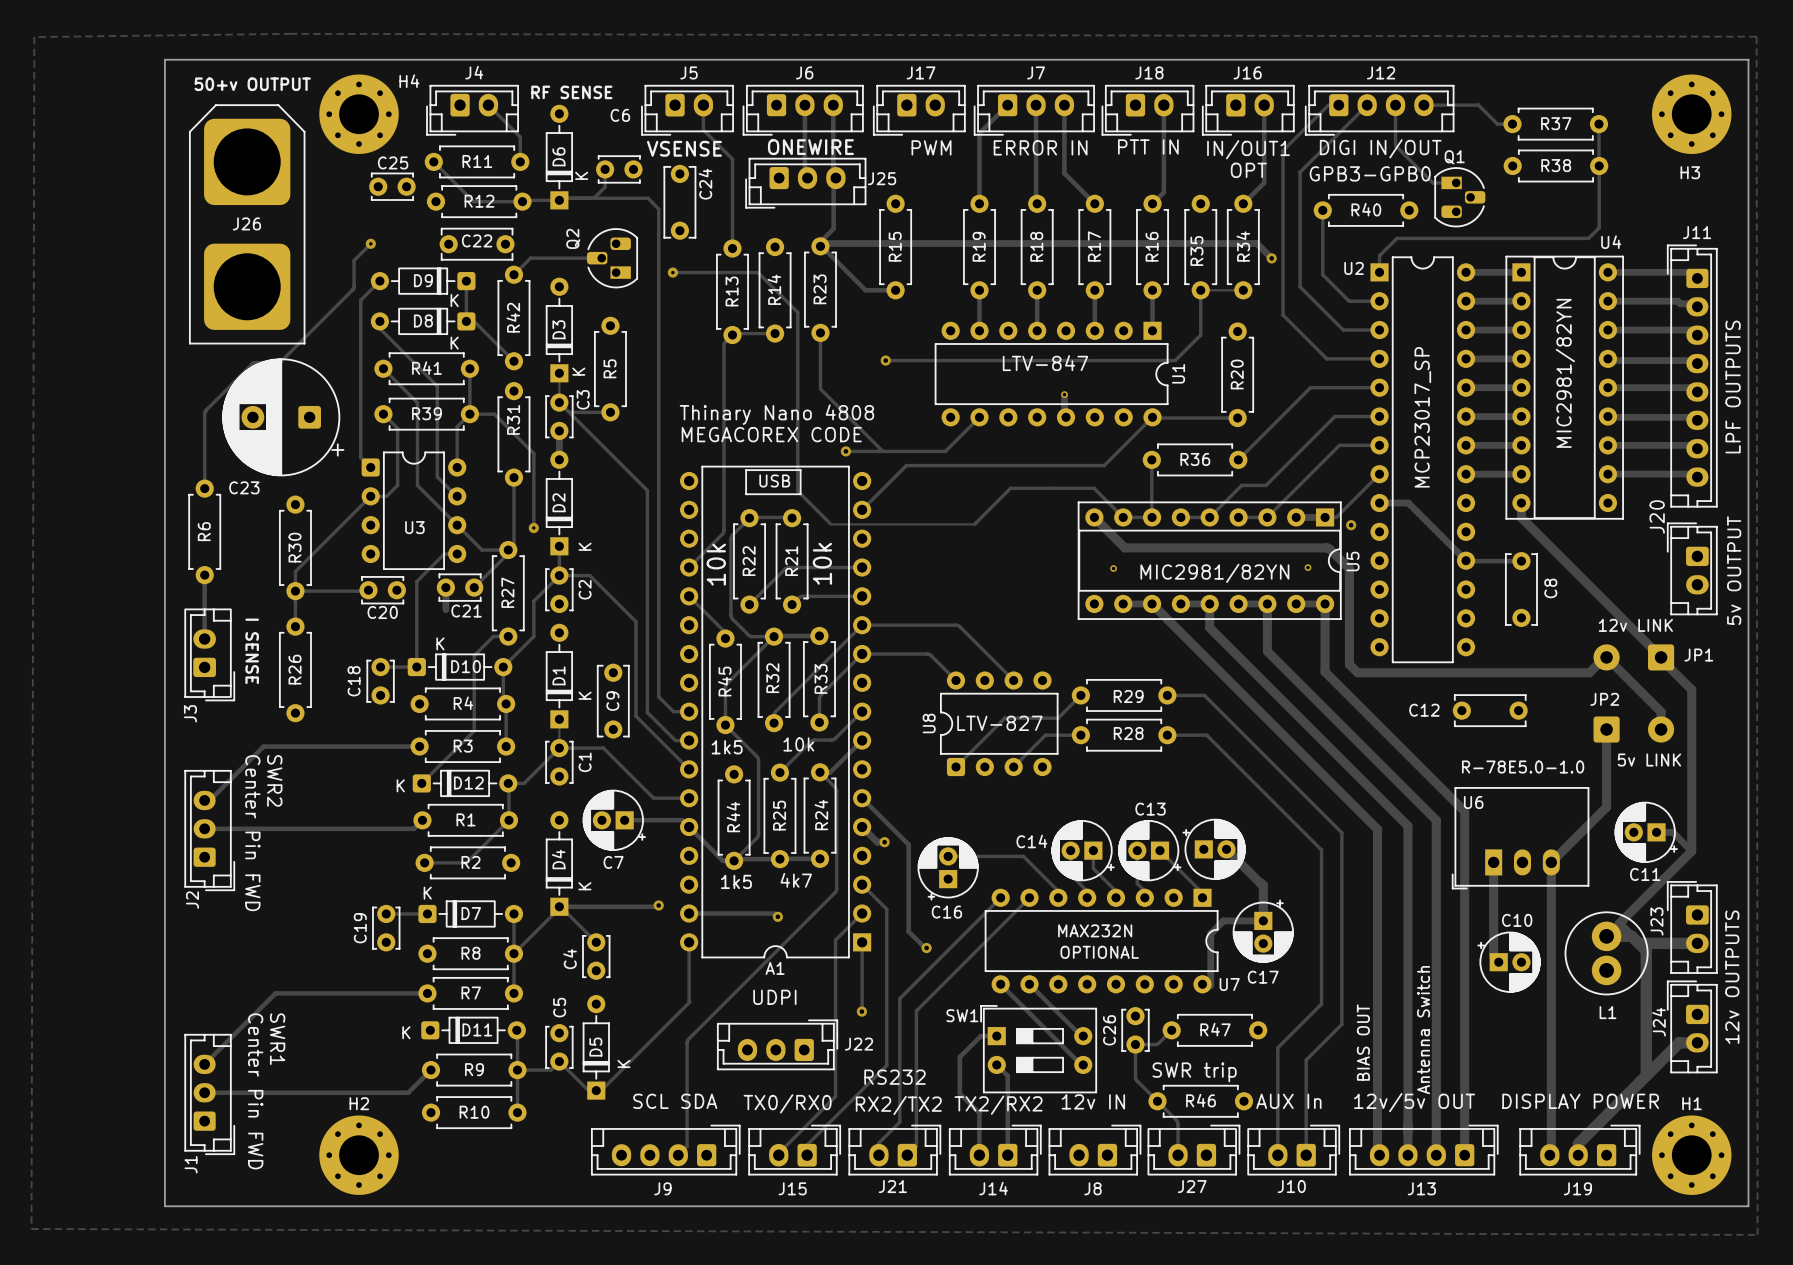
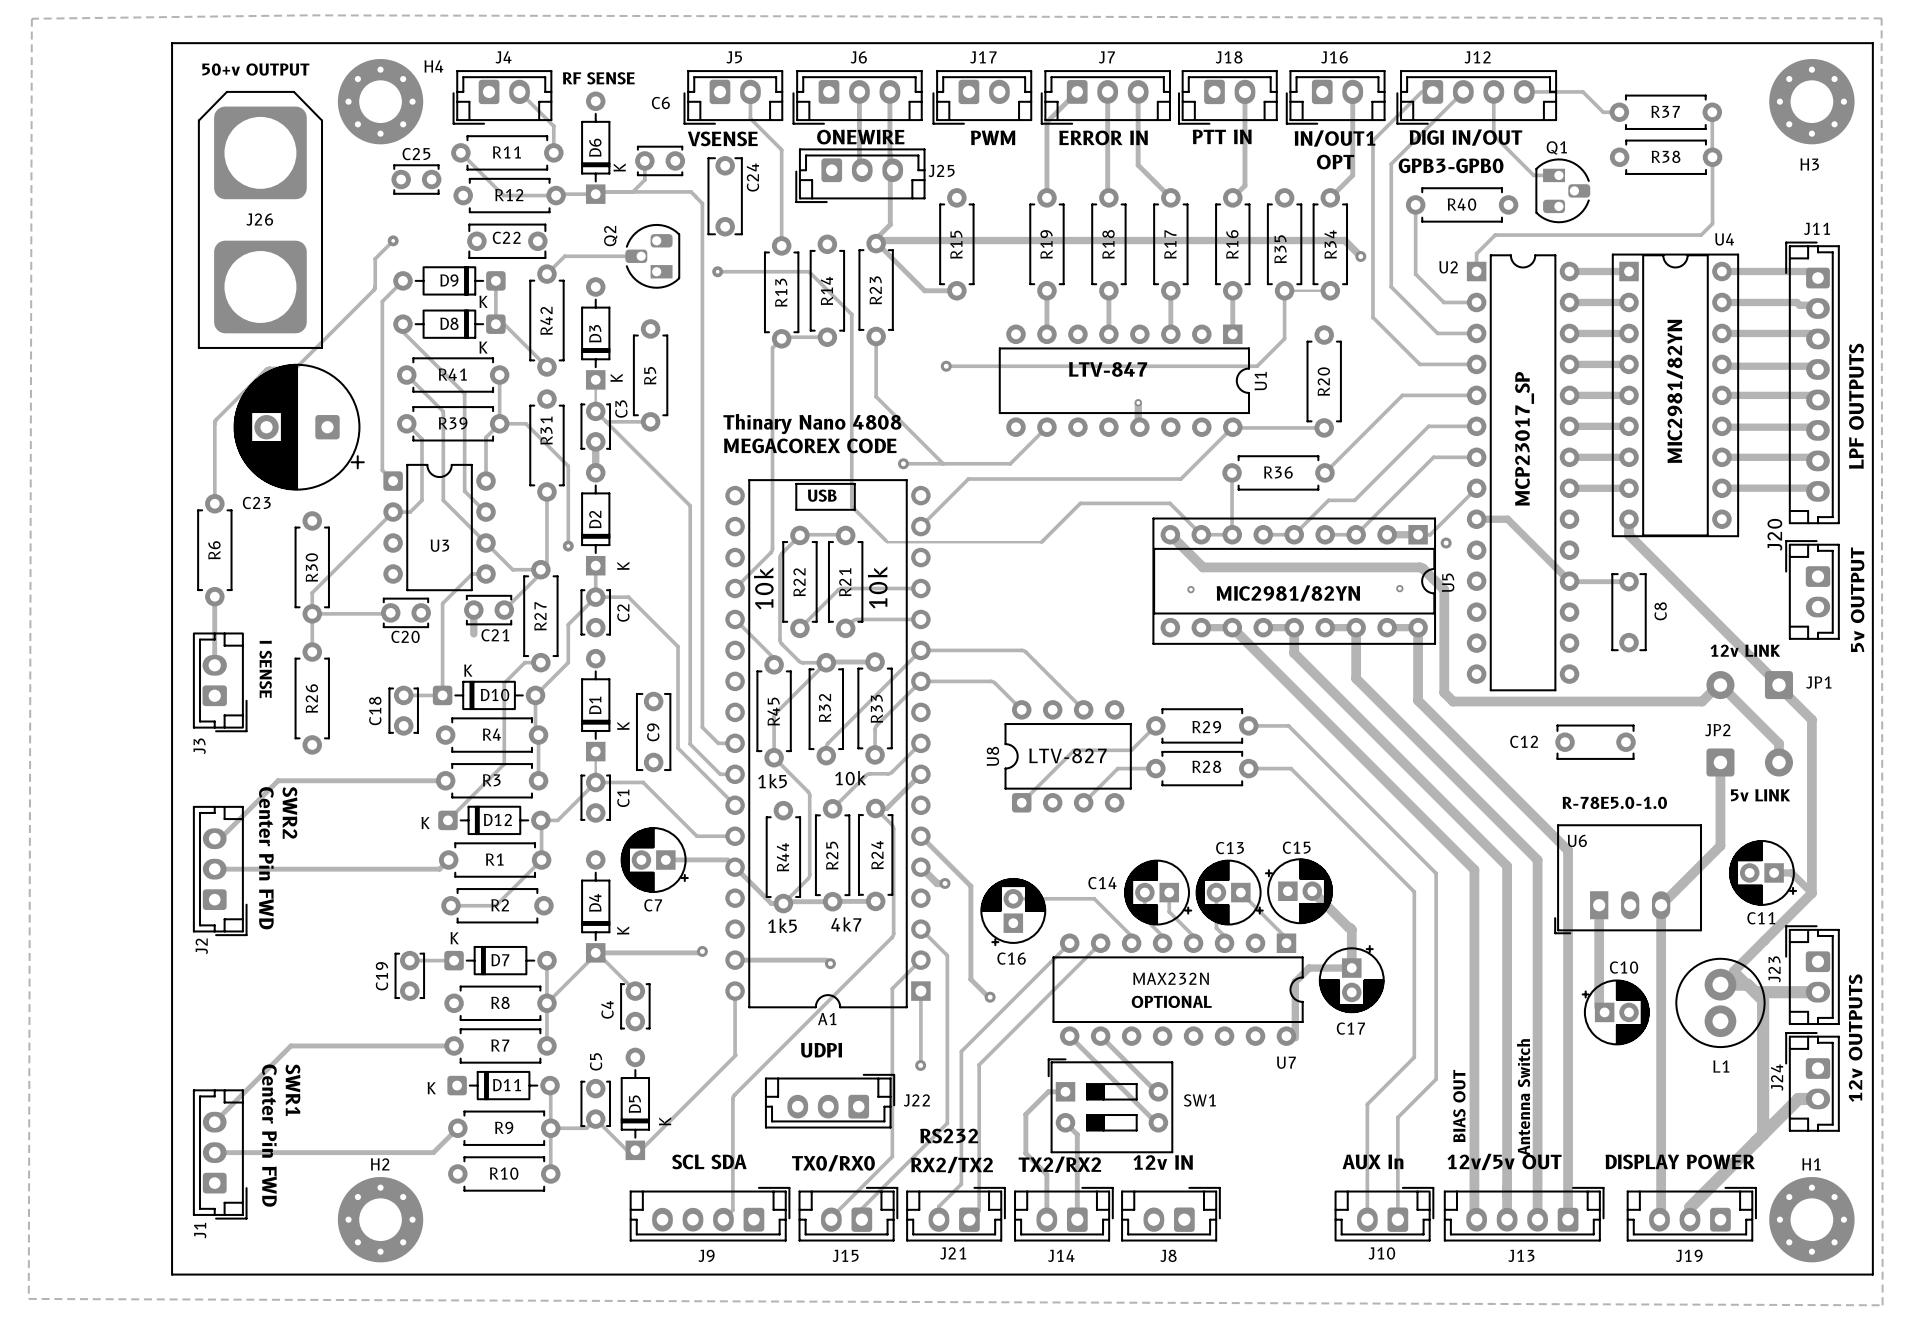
C15 name: none -> C15 (1296, 847)
U7 name position: U7 (1229, 984) -> U7 (1286, 1062)
SW1 name position: SW1 (962, 1015) -> SW1 (1199, 1100)
C26: (1135, 1030) -> none
track: (1171, 1030) (1157, 1044) (1135, 1044) (1135, 1077) (1177, 1121) (1178, 1155) -> none
R47: (1214, 1030) -> none
text: SWR trip (1194, 1072) -> none
R46: (1200, 1101) -> none
J27: (1193, 1150) -> none

